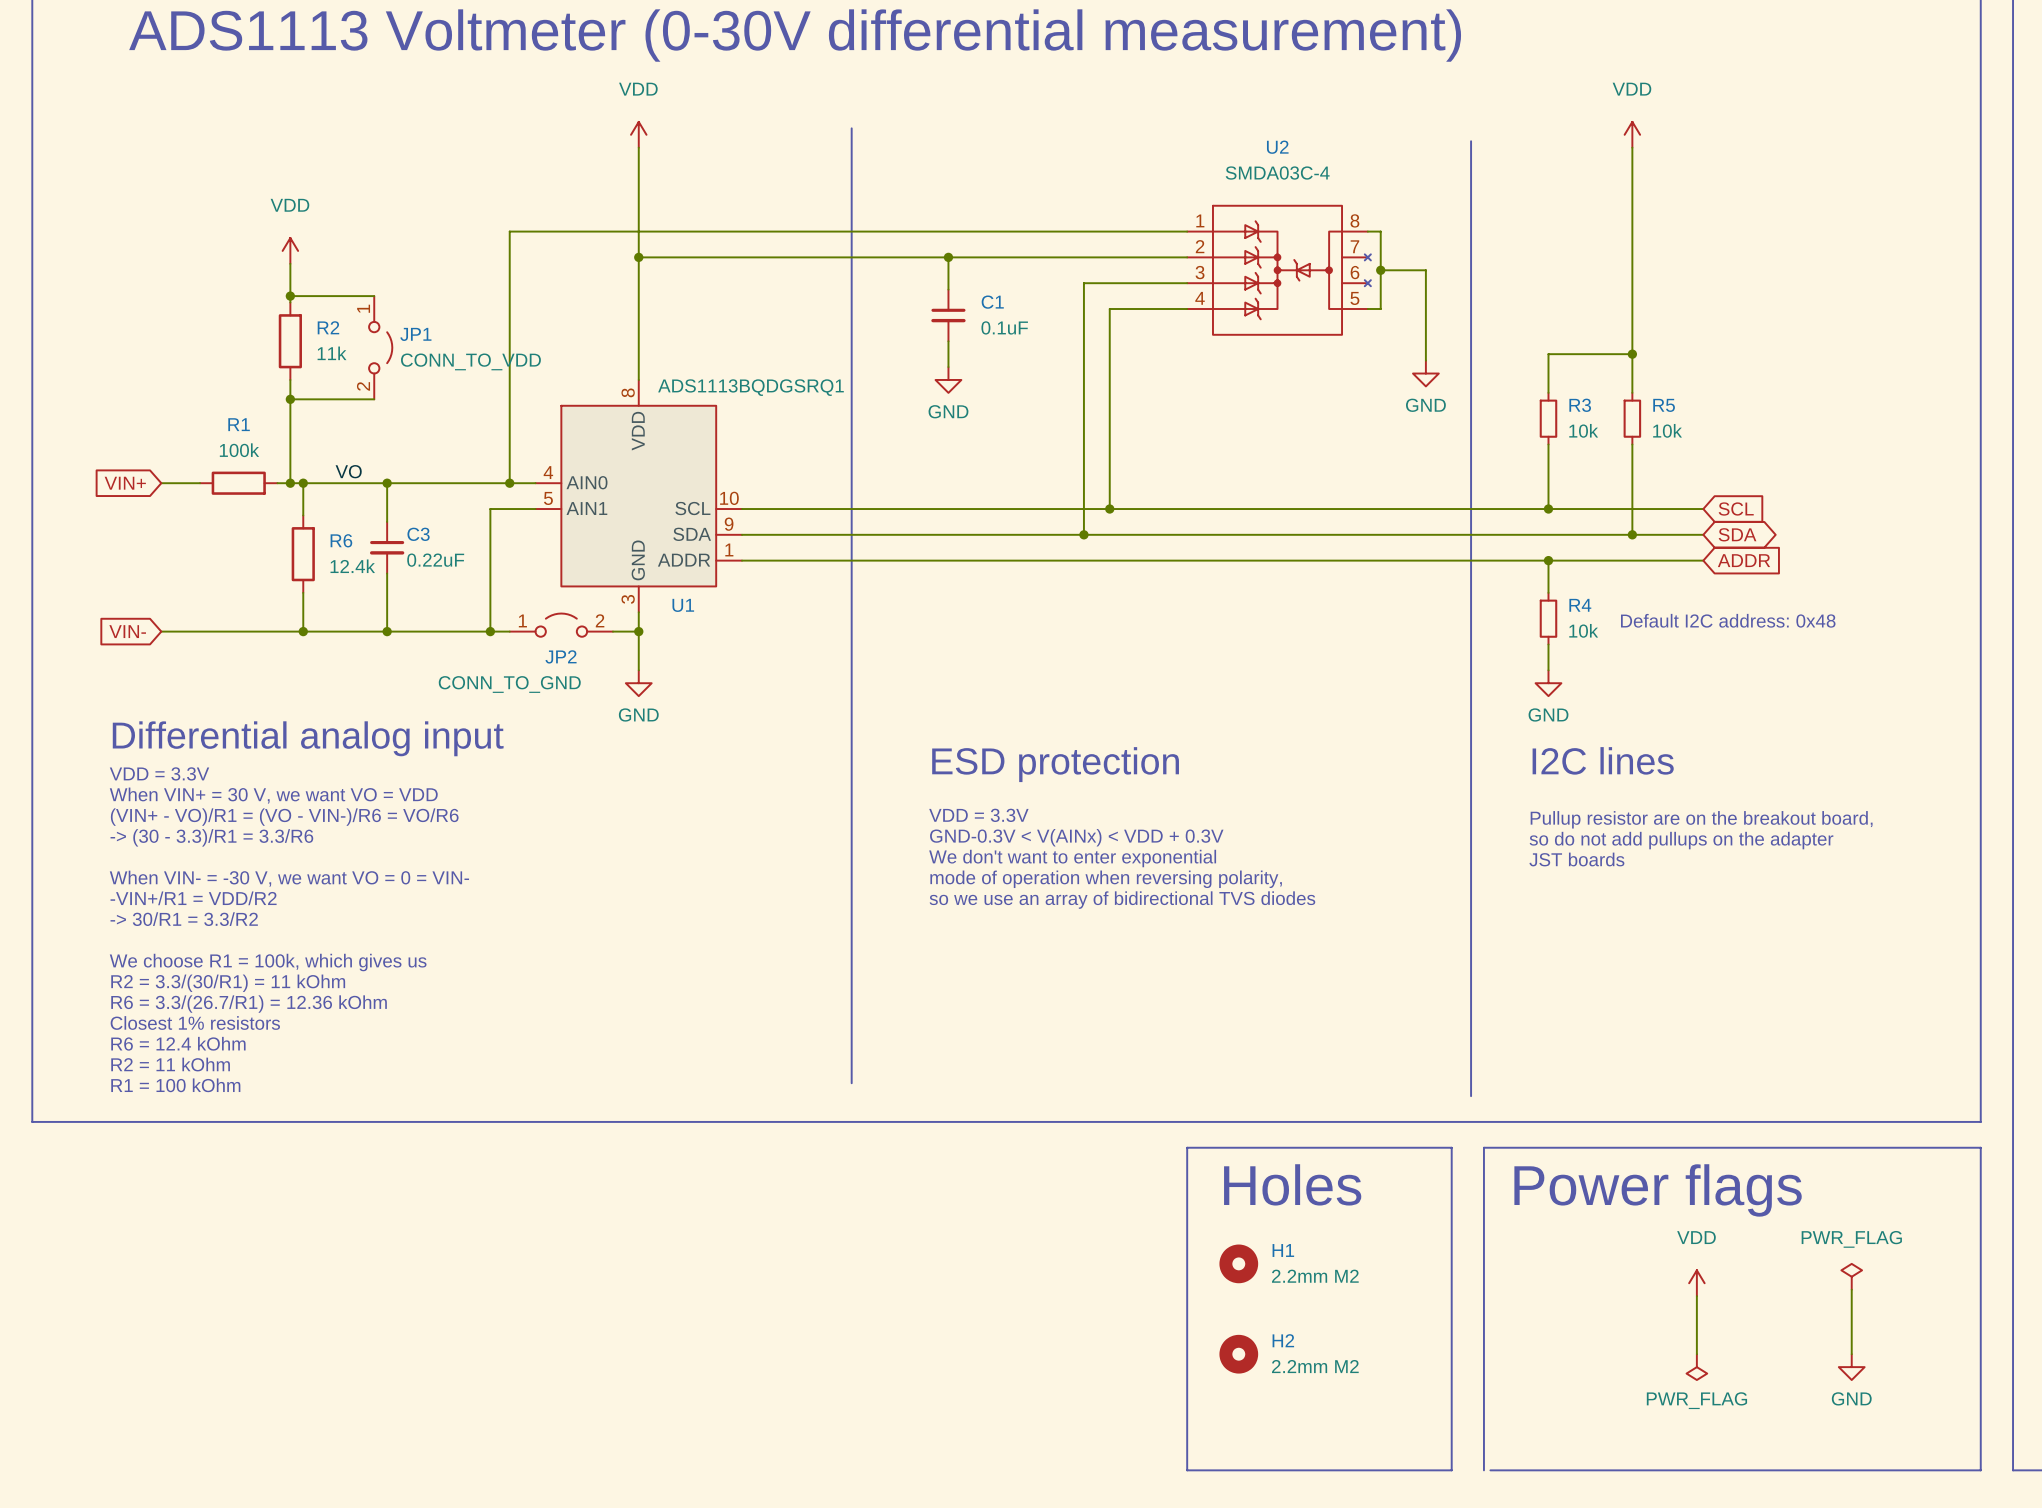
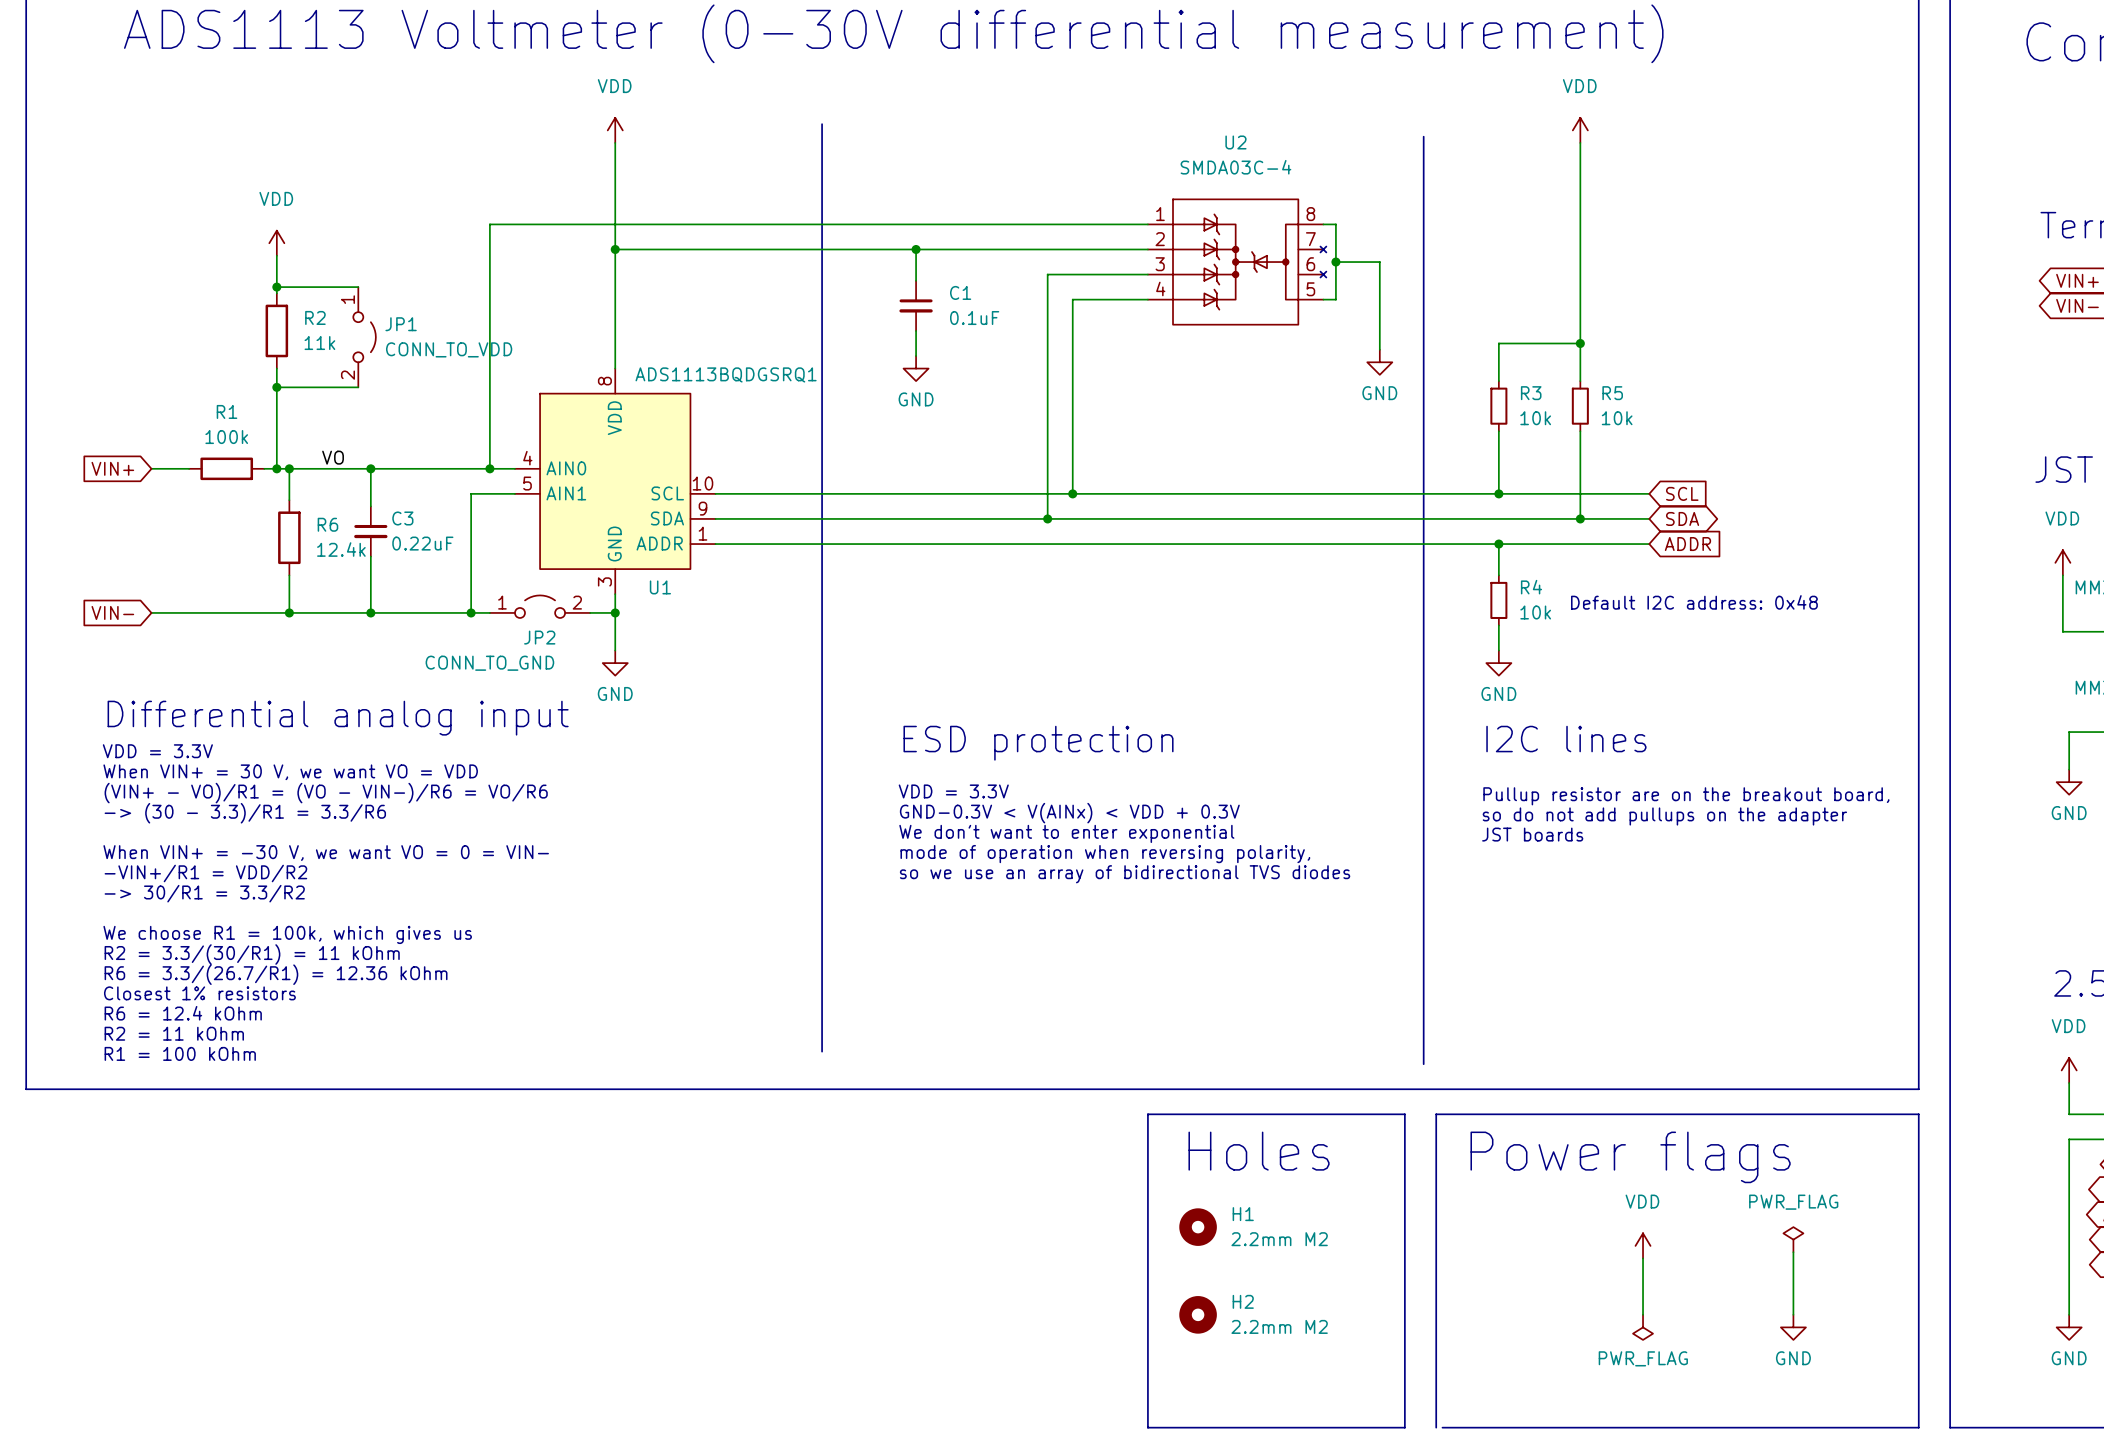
text: When VIN- = -30 V, we want VO = 0 = VIN- (289, 878) -> When VIN+ = -30 V, we want VO = 0 = VIN- (326, 853)

